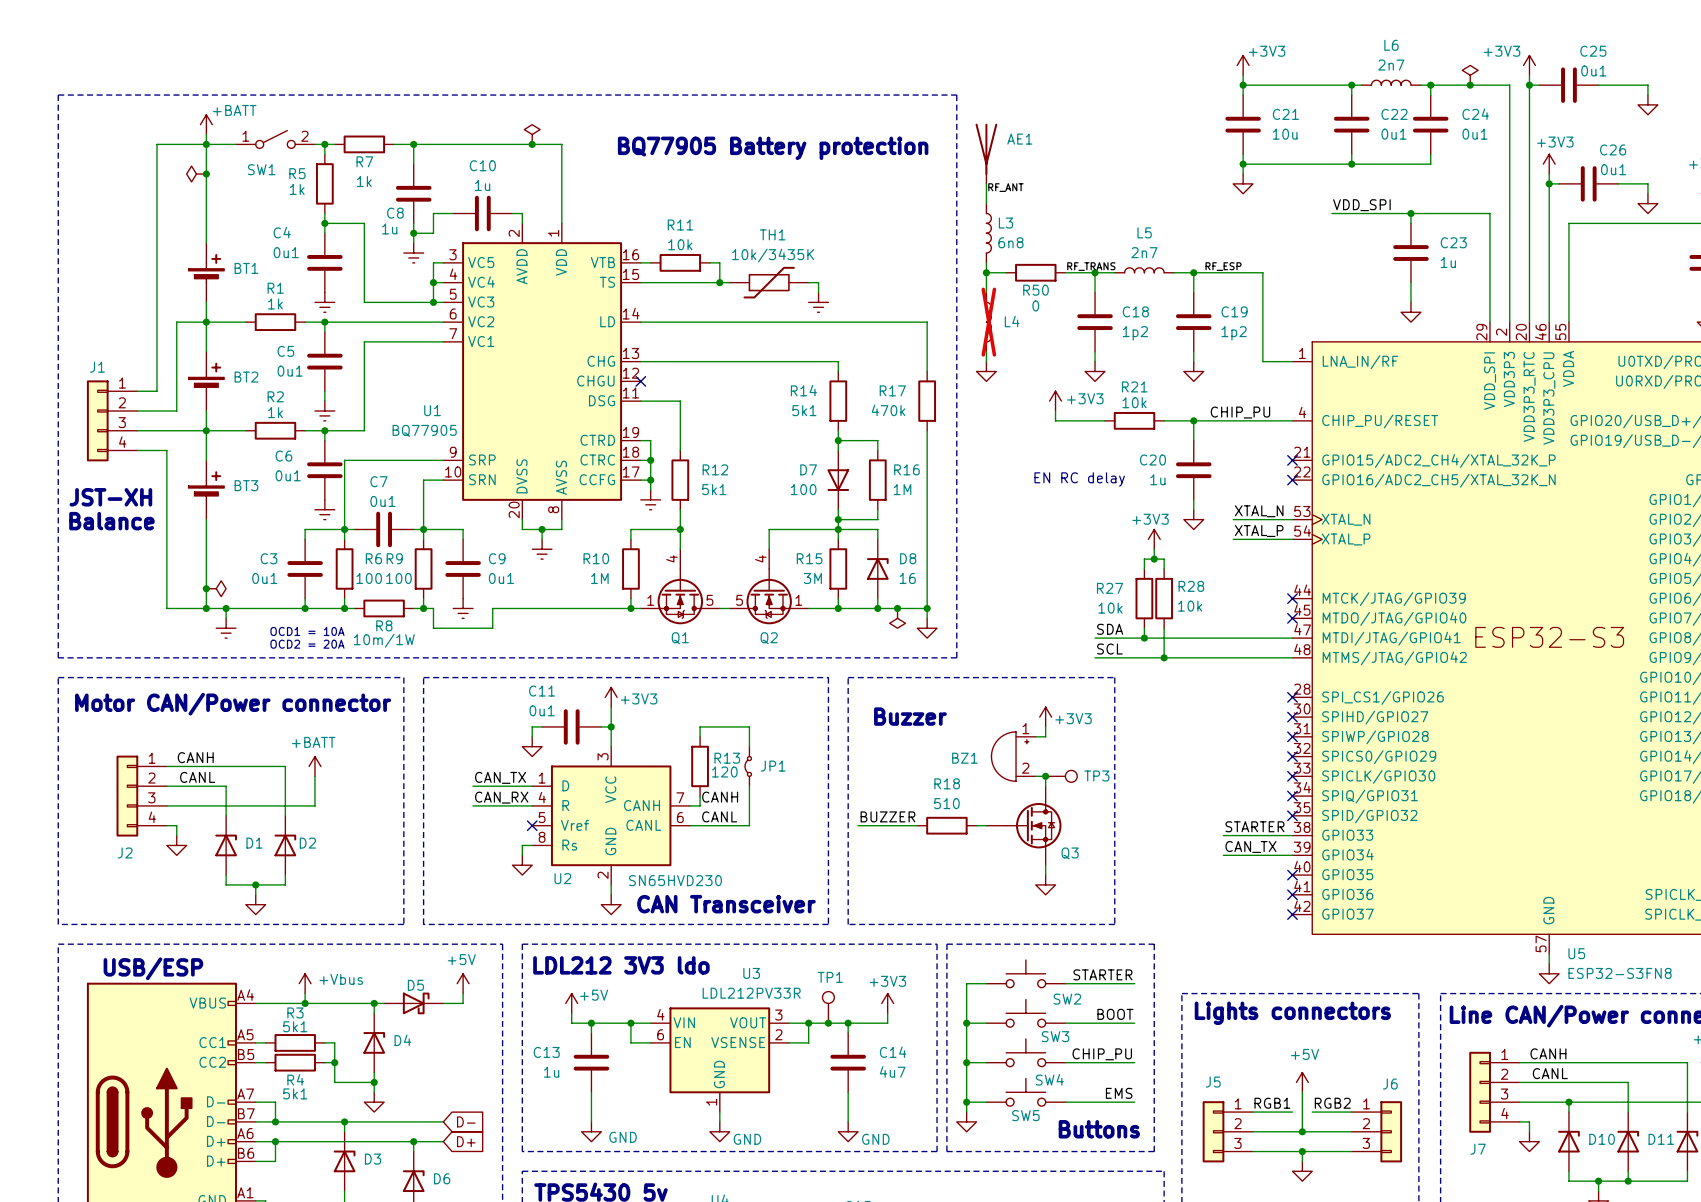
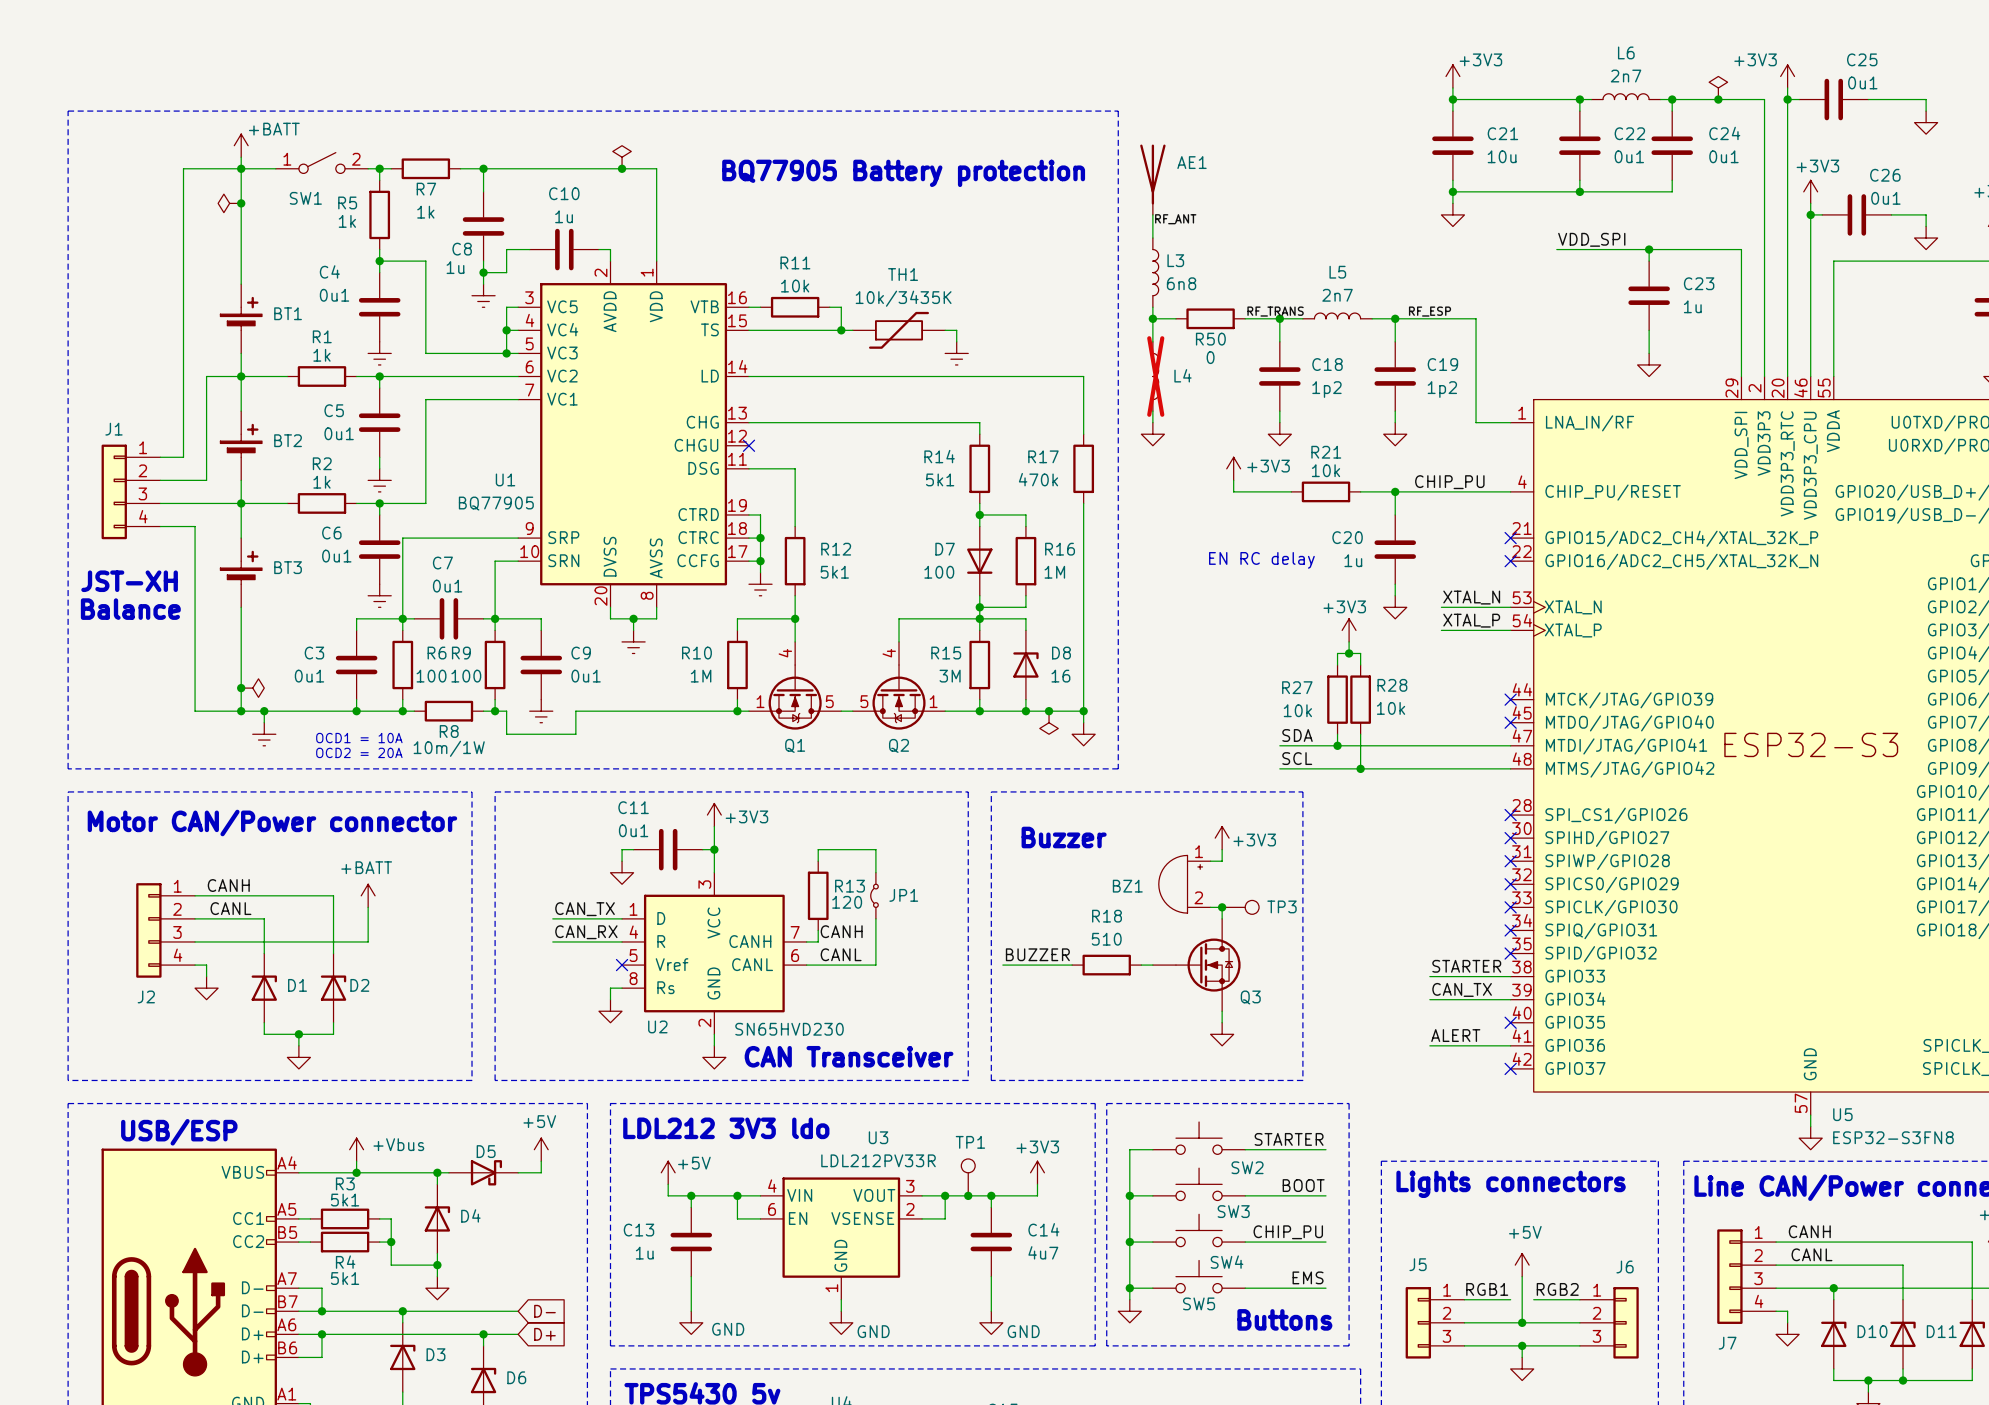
label: none -> ALERT (1455, 1035)
wire: none -> (1429, 1045) (1510, 1045)
no-connect mark: (1292, 894) -> none

